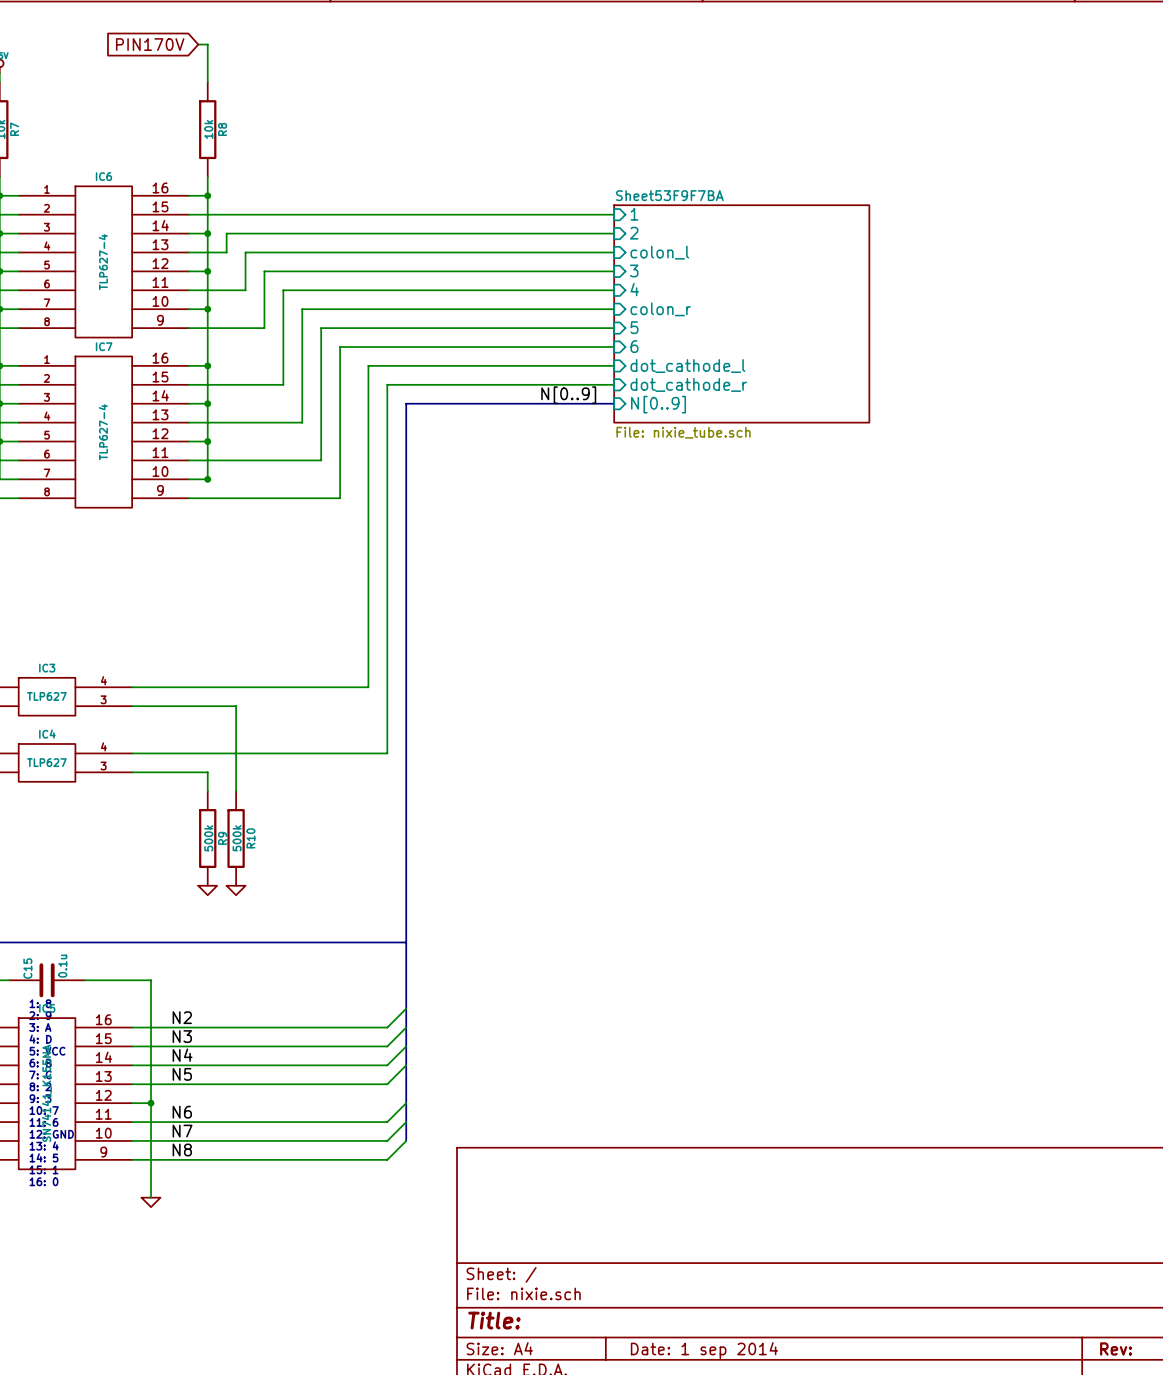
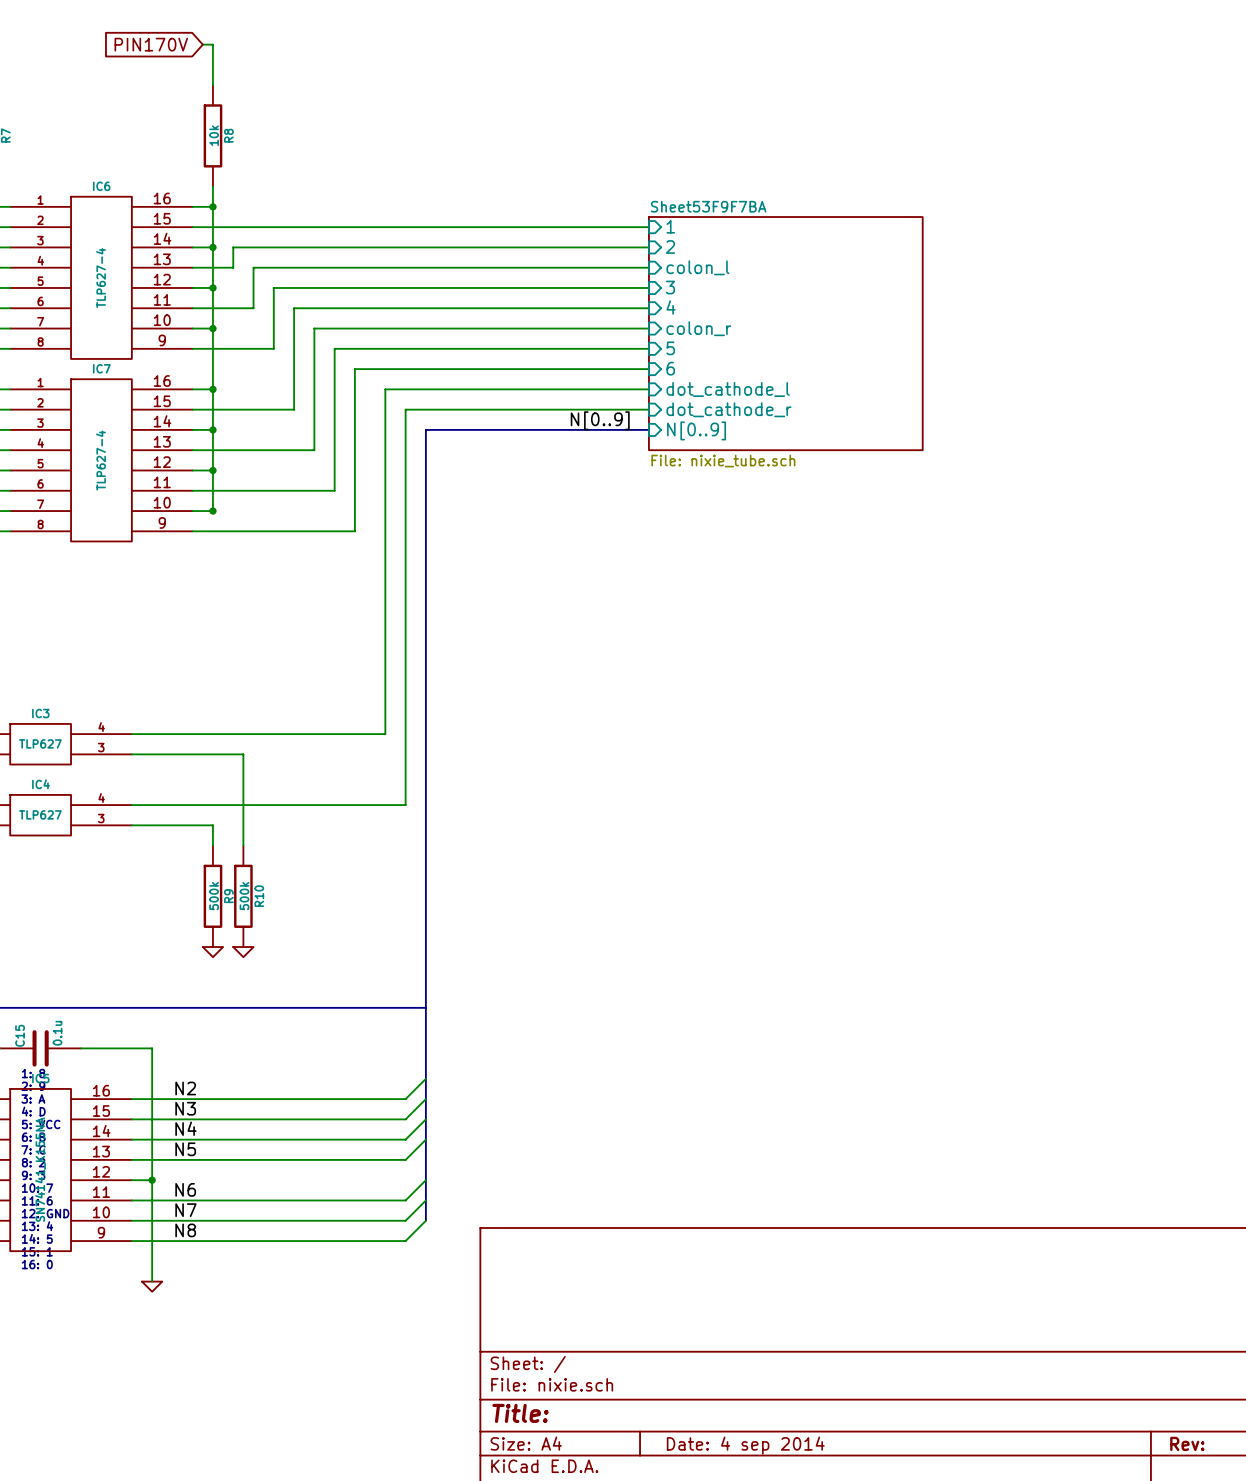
title block: Date: 1 sep 2014 (704, 1350) -> Date: 4 sep 2014 (745, 1445)

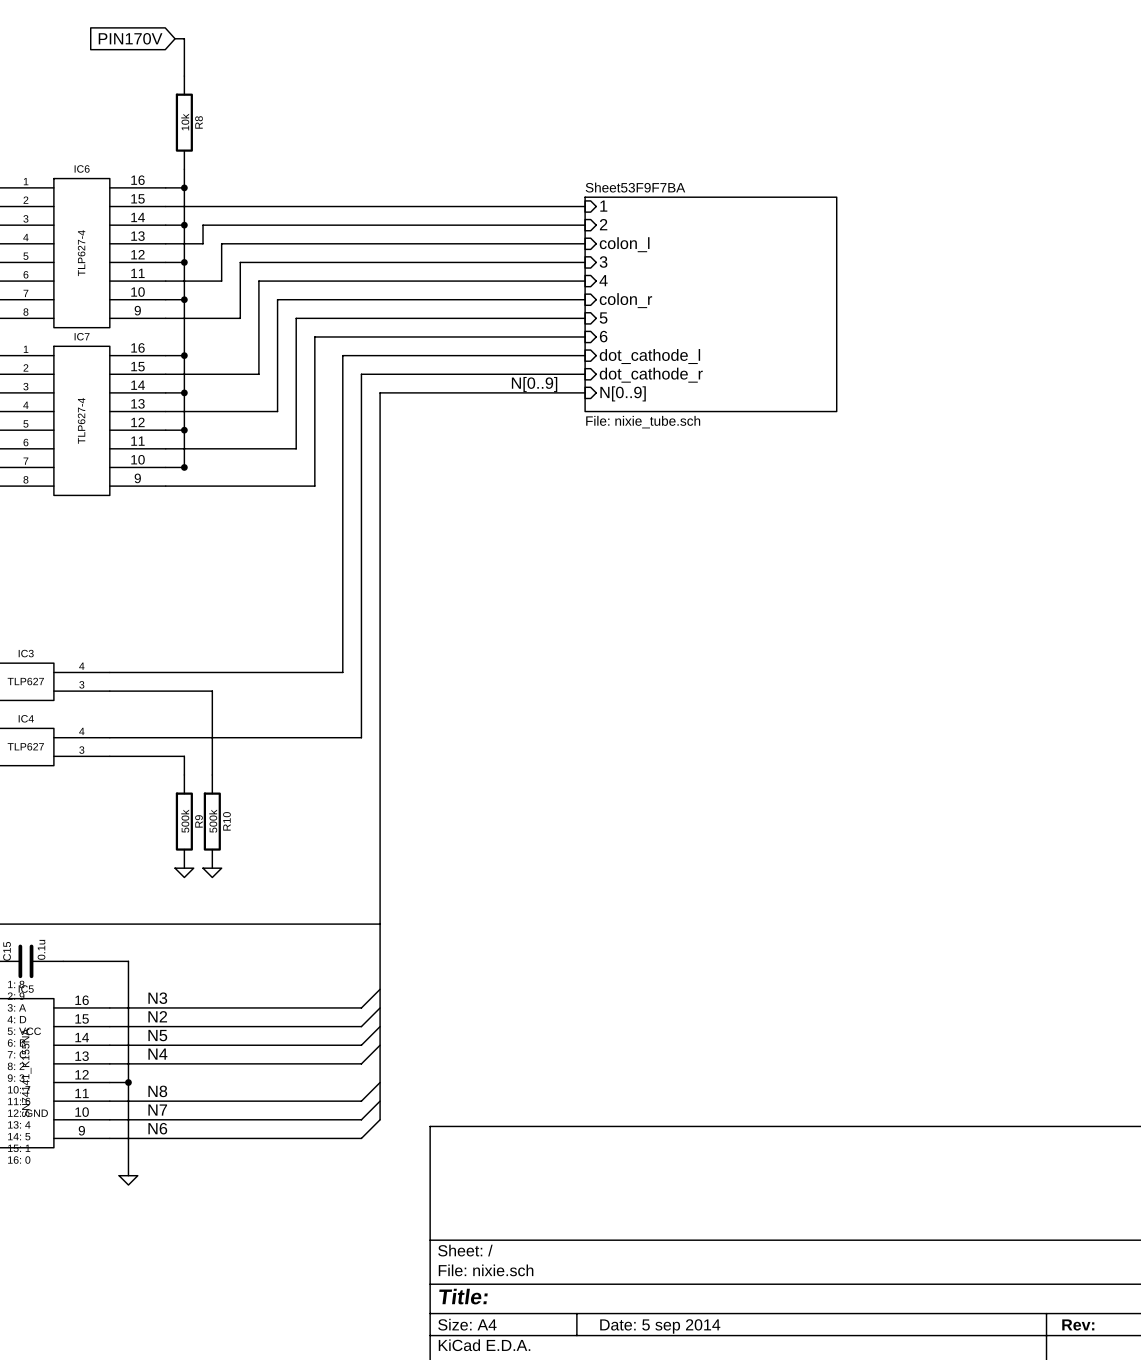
label: N2 (185, 1088) -> N3 (157, 998)
label: N3 (185, 1108) -> N2 (157, 1016)
label: N4 (185, 1128) -> N5 (157, 1035)
label: N5 (185, 1149) -> N4 (157, 1054)
label: N6 (185, 1189) -> N8 (157, 1091)
label: N8 (185, 1230) -> N6 (157, 1128)
title block: Date: 4 sep 2014 (745, 1445) -> Date: 5 sep 2014 (660, 1326)

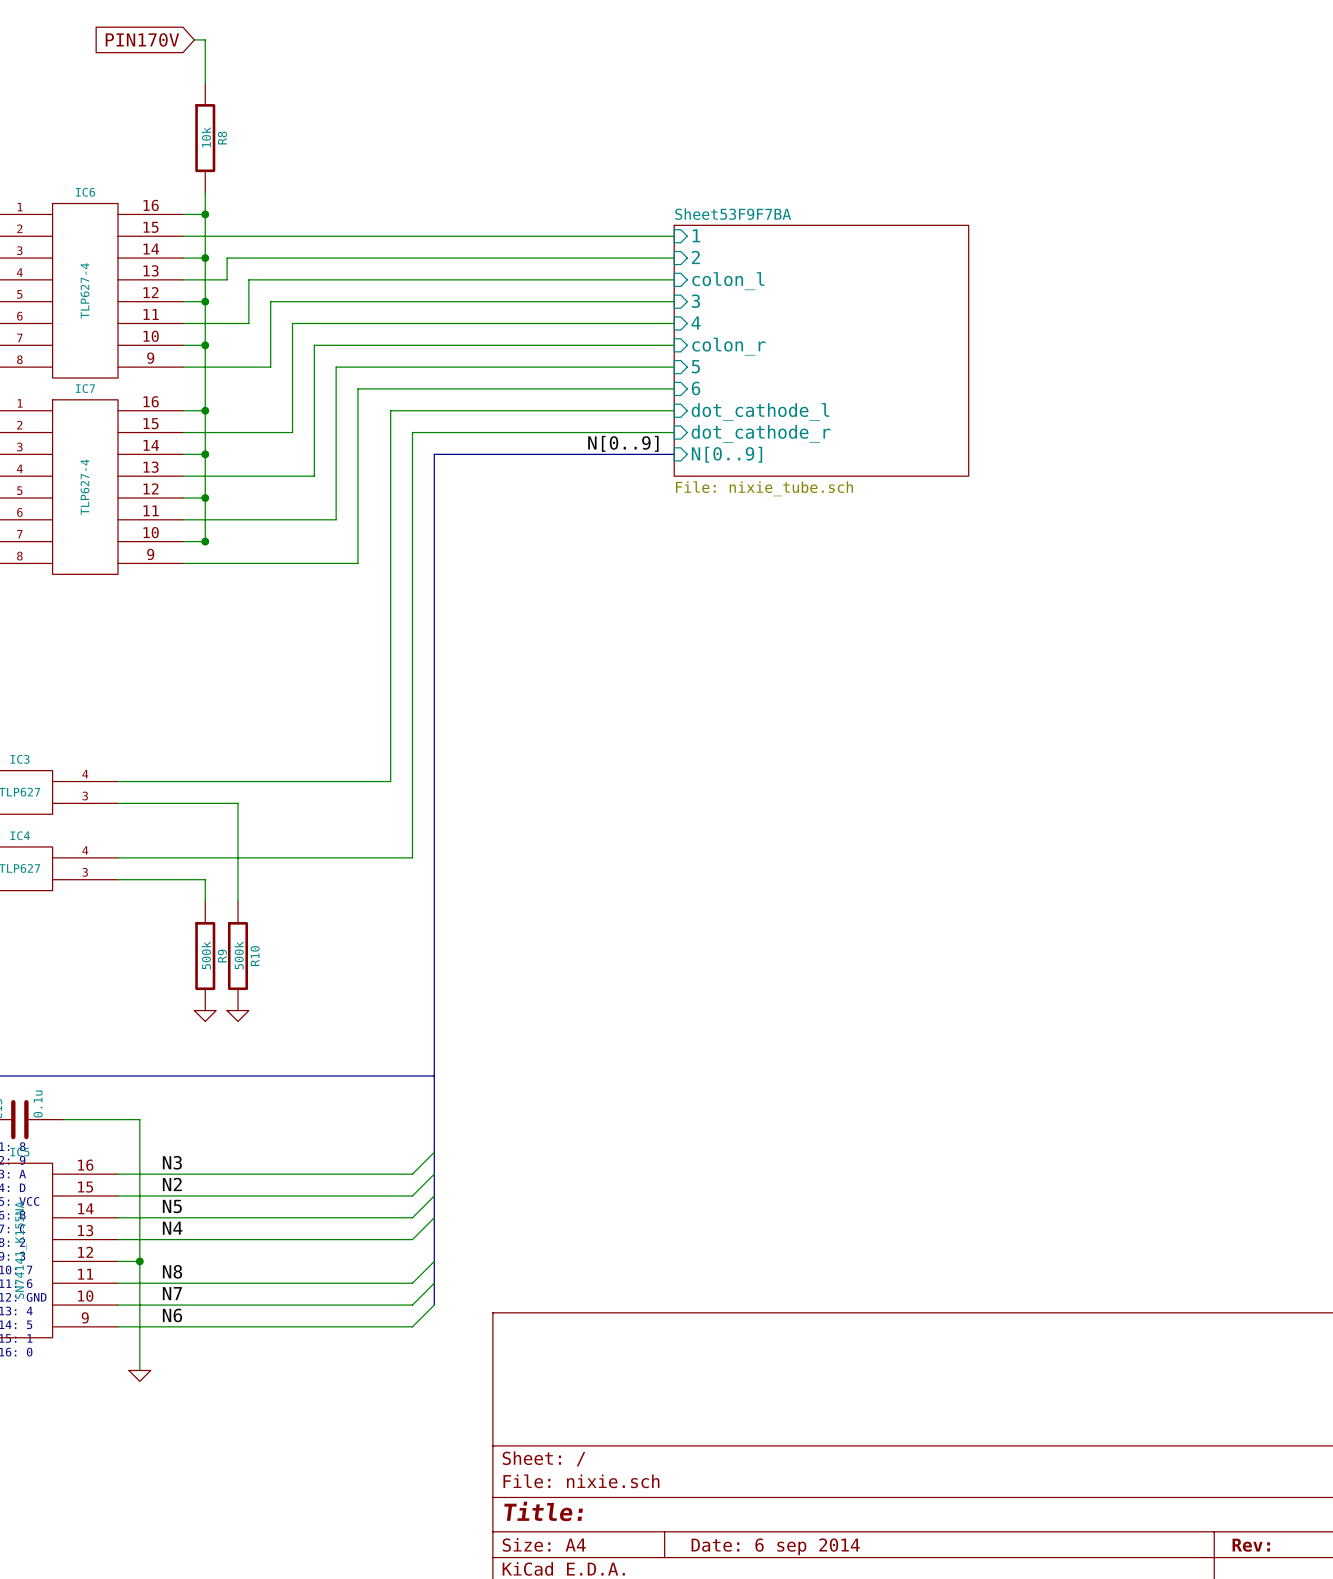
title block: Date: 5 sep 2014 (660, 1326) -> Date: 6 sep 2014 (775, 1546)

